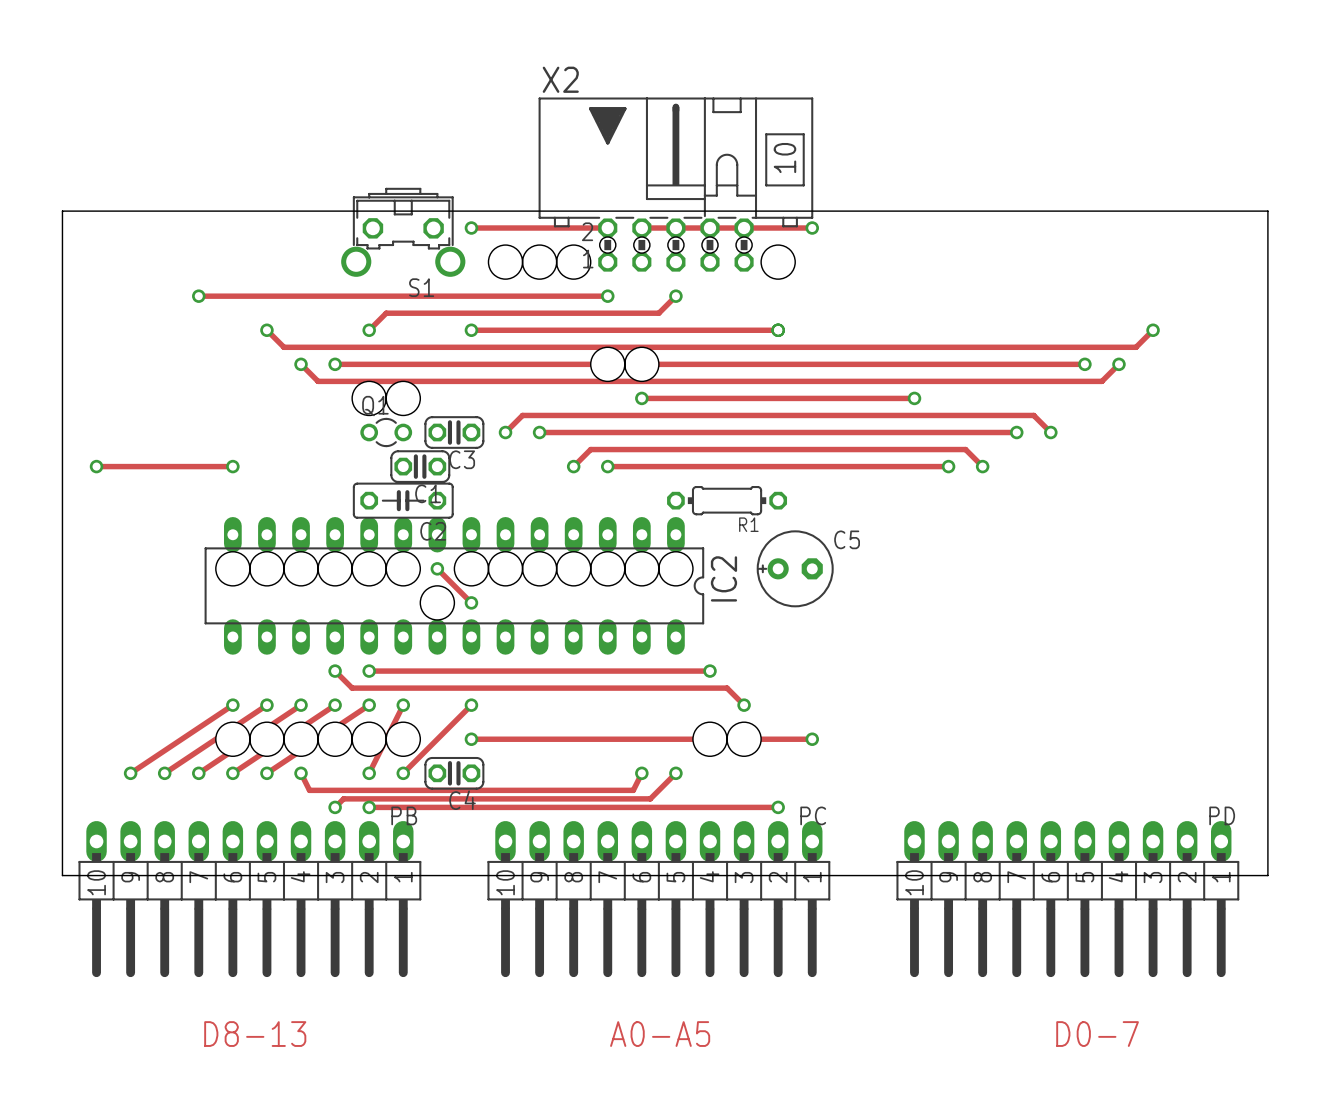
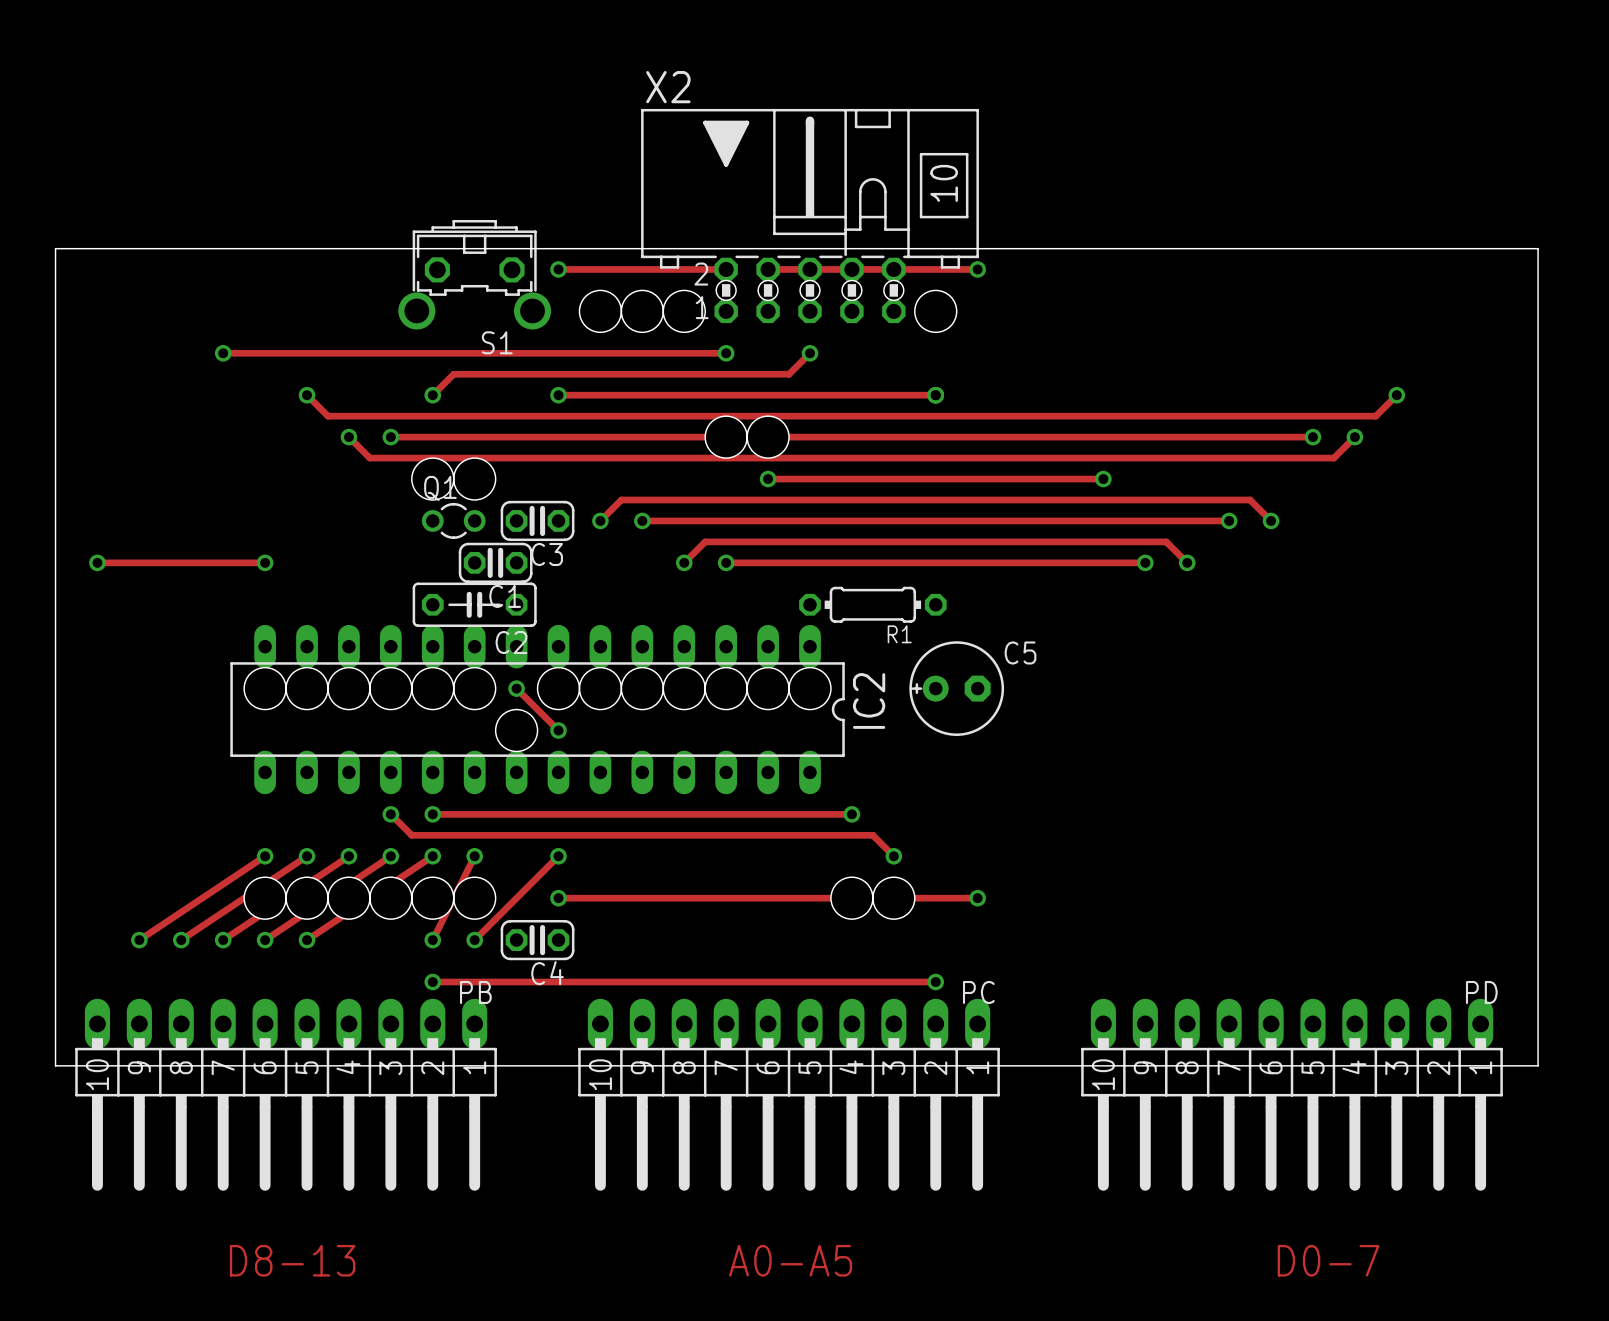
track: (301, 773) (309, 790) (633, 790) (641, 773) -> none
via: (301, 773) -> none
via: (641, 773) -> none
track: (675, 773) (650, 798) (343, 798) (335, 807) -> none
via: (675, 773) -> none
via: (335, 807) -> none

